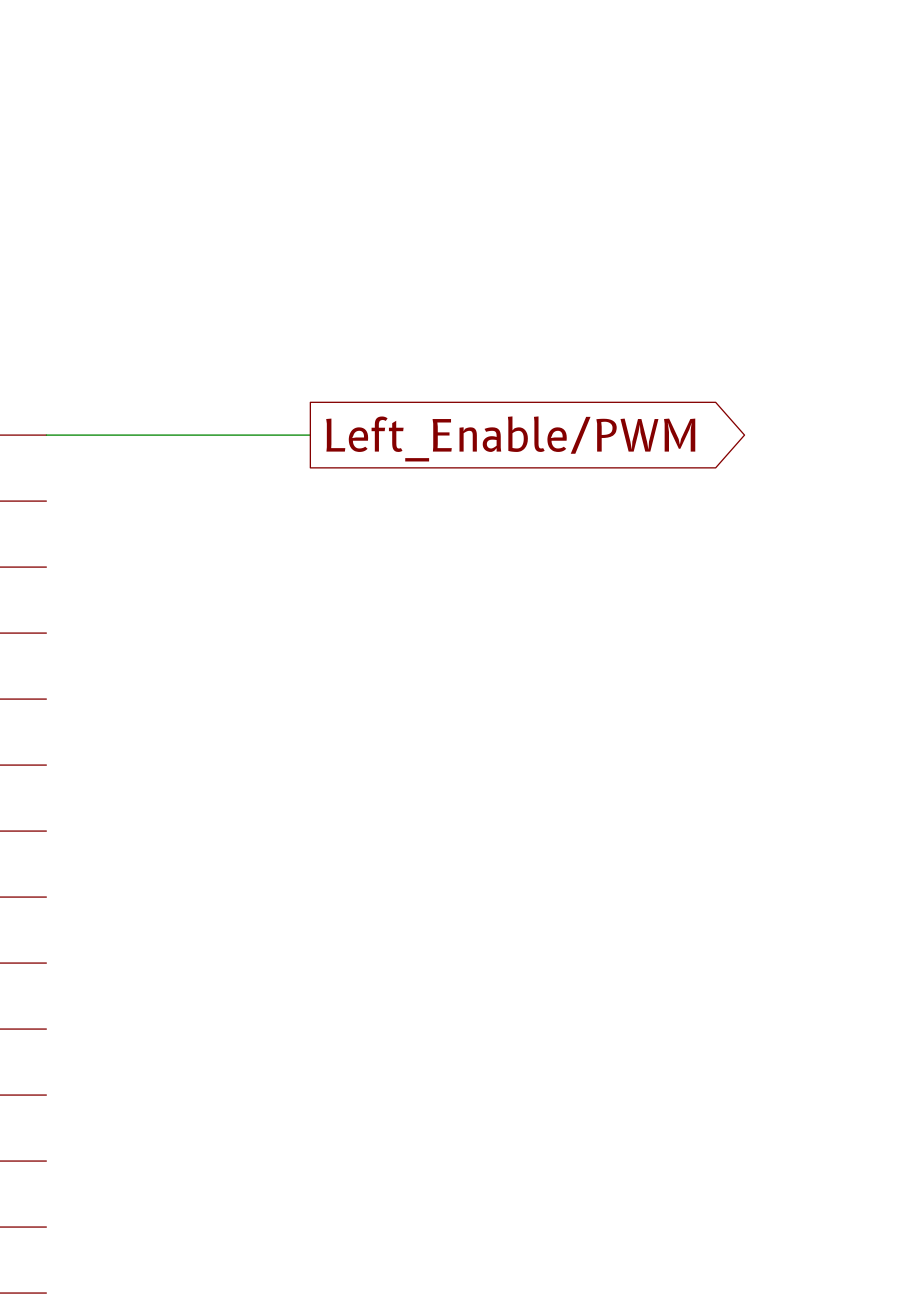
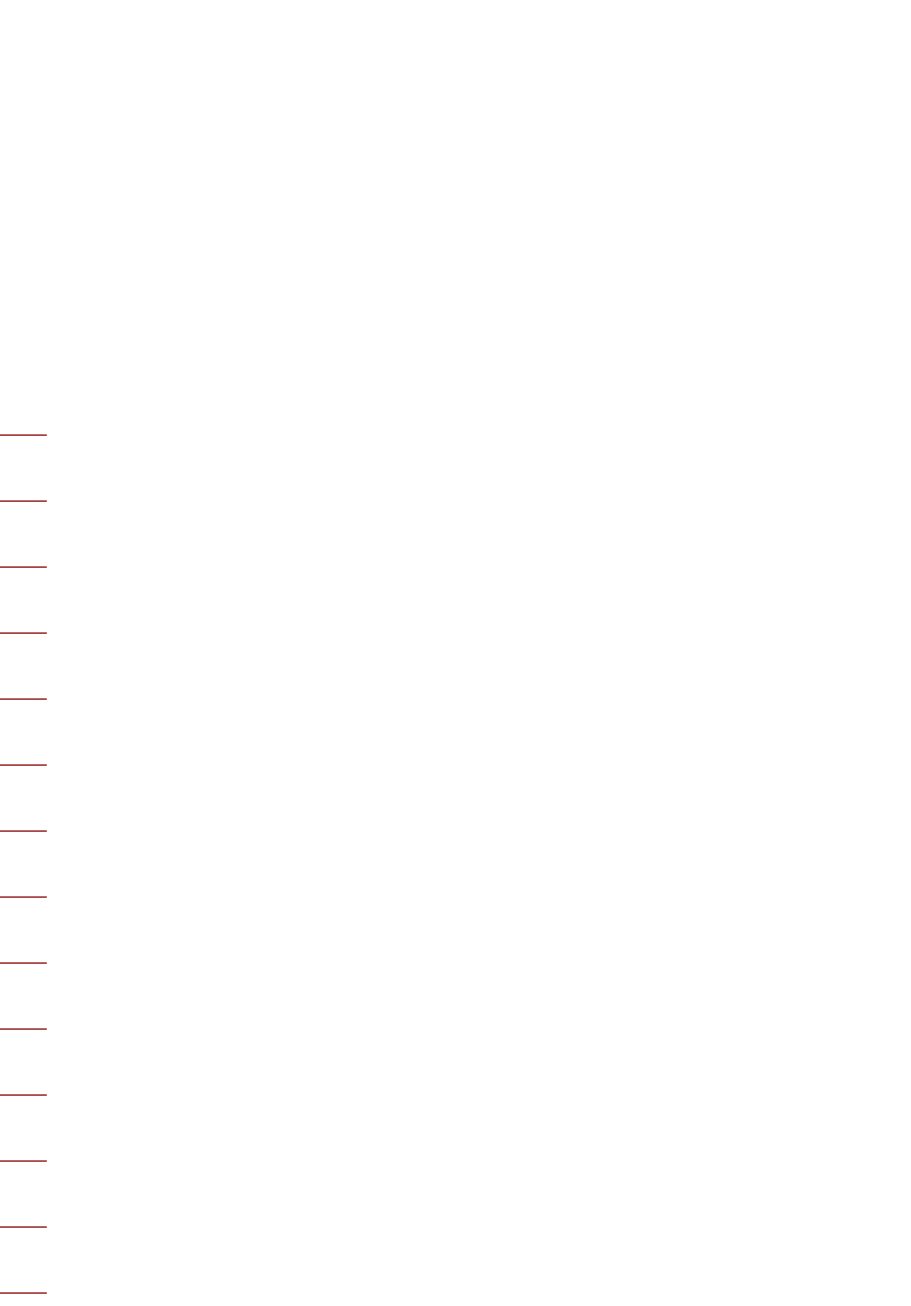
wire: (46, 435) (310, 435) -> none
global label: Left_Enable/PWM (510, 438) -> none

